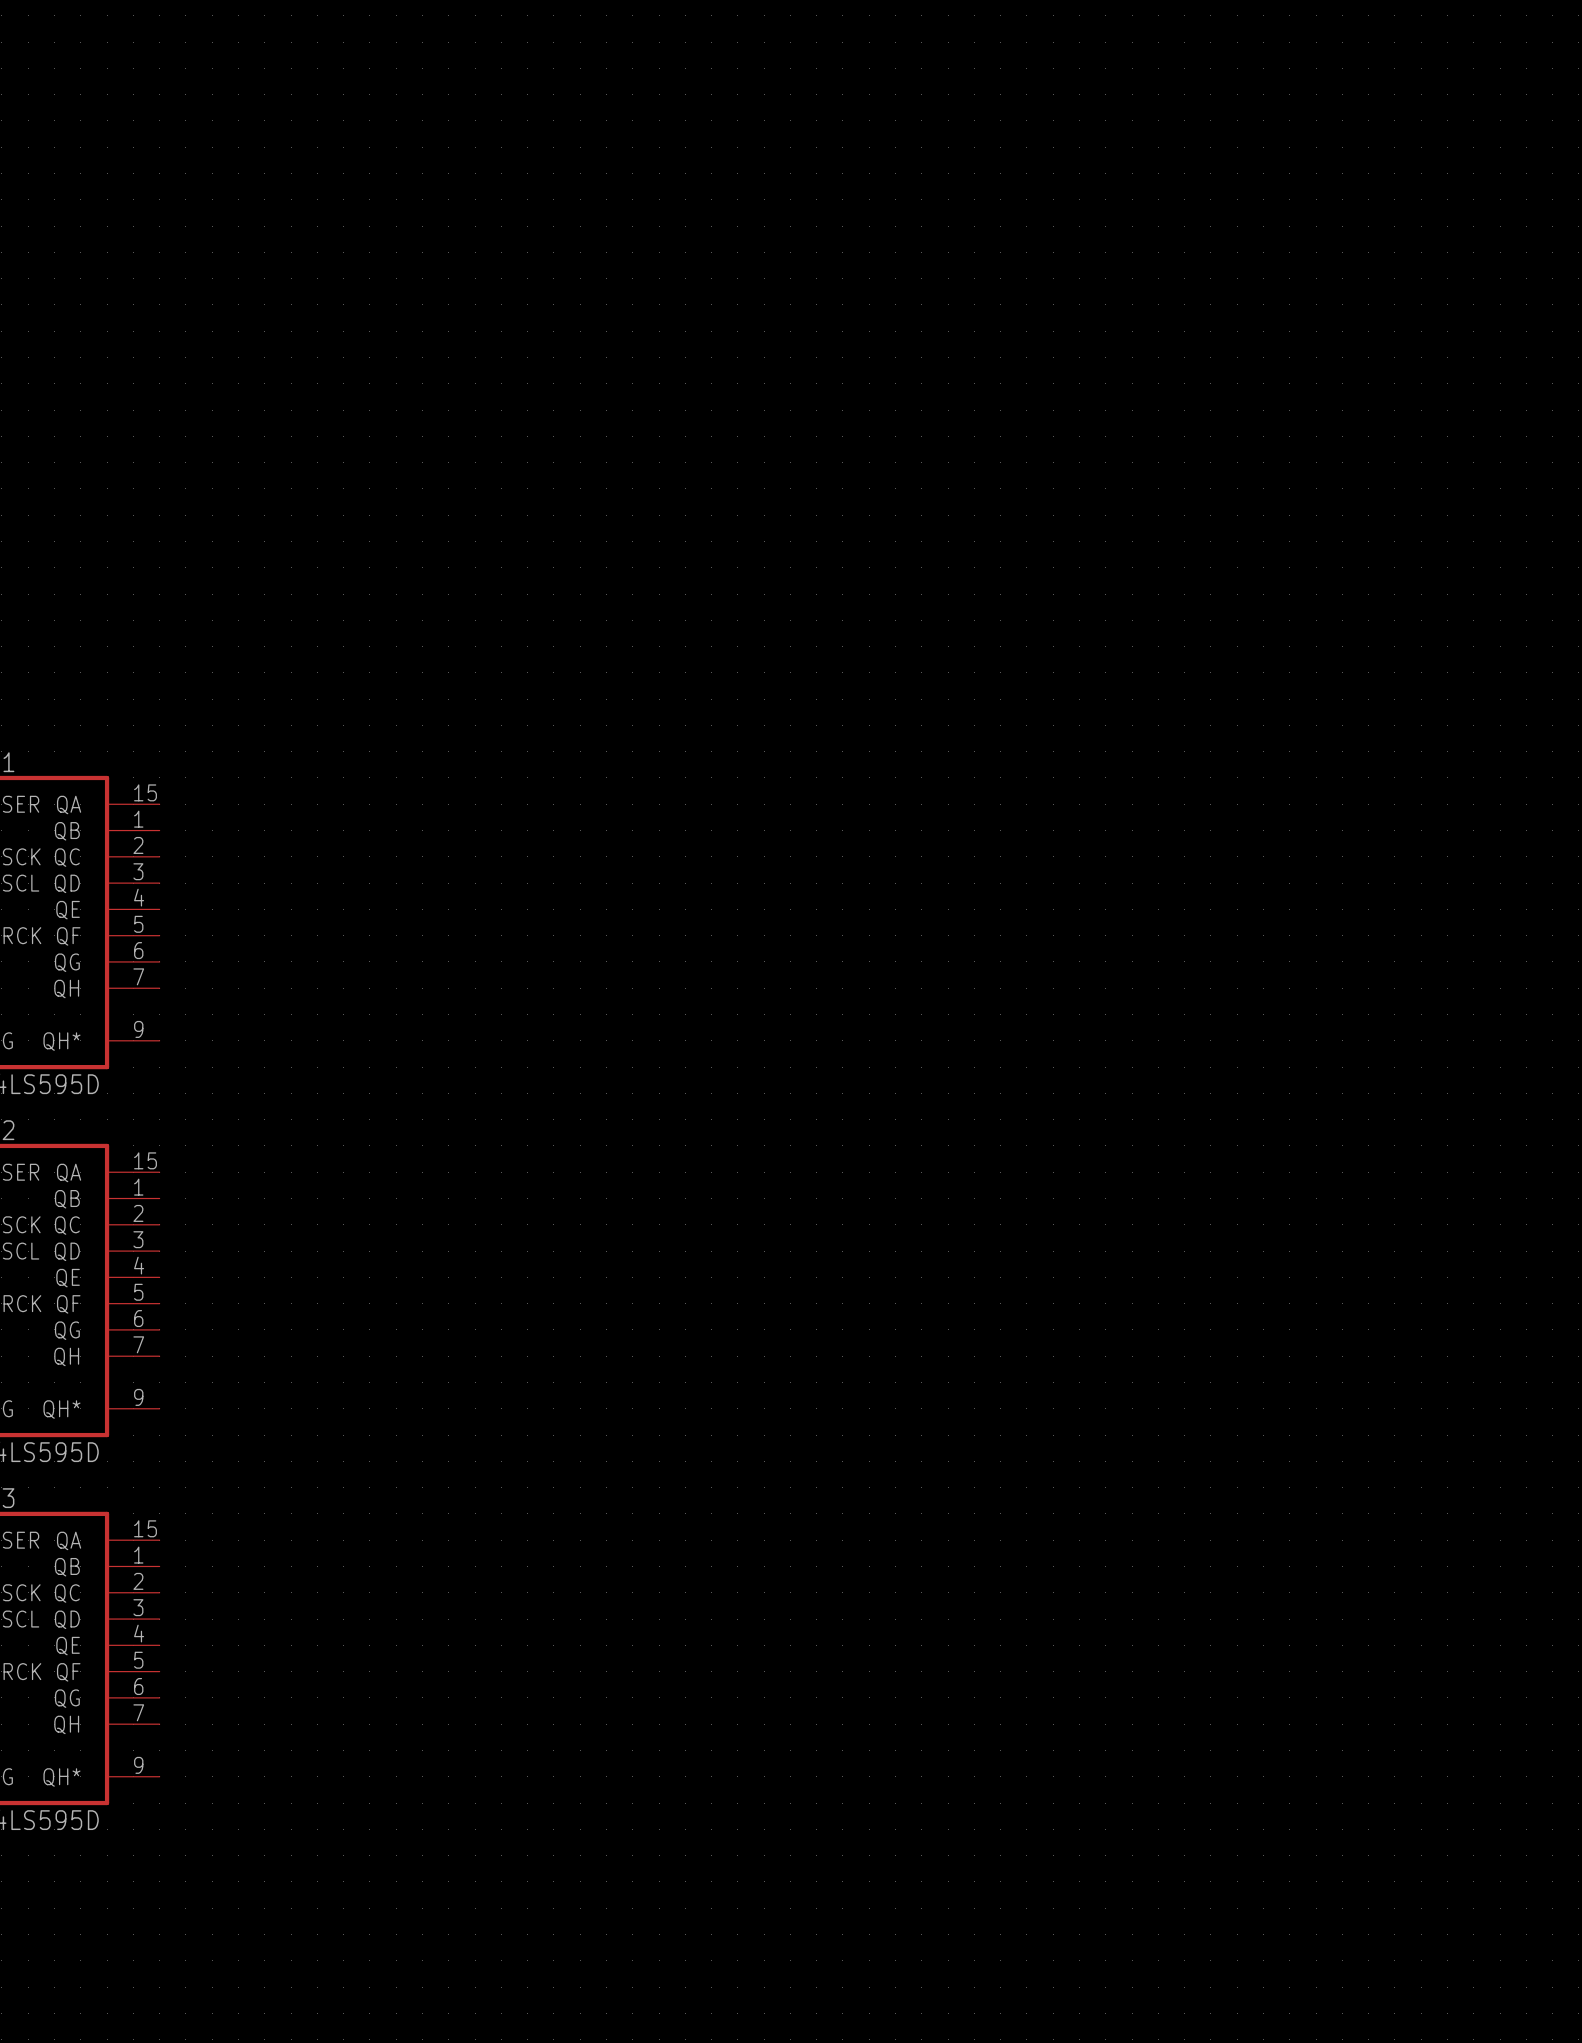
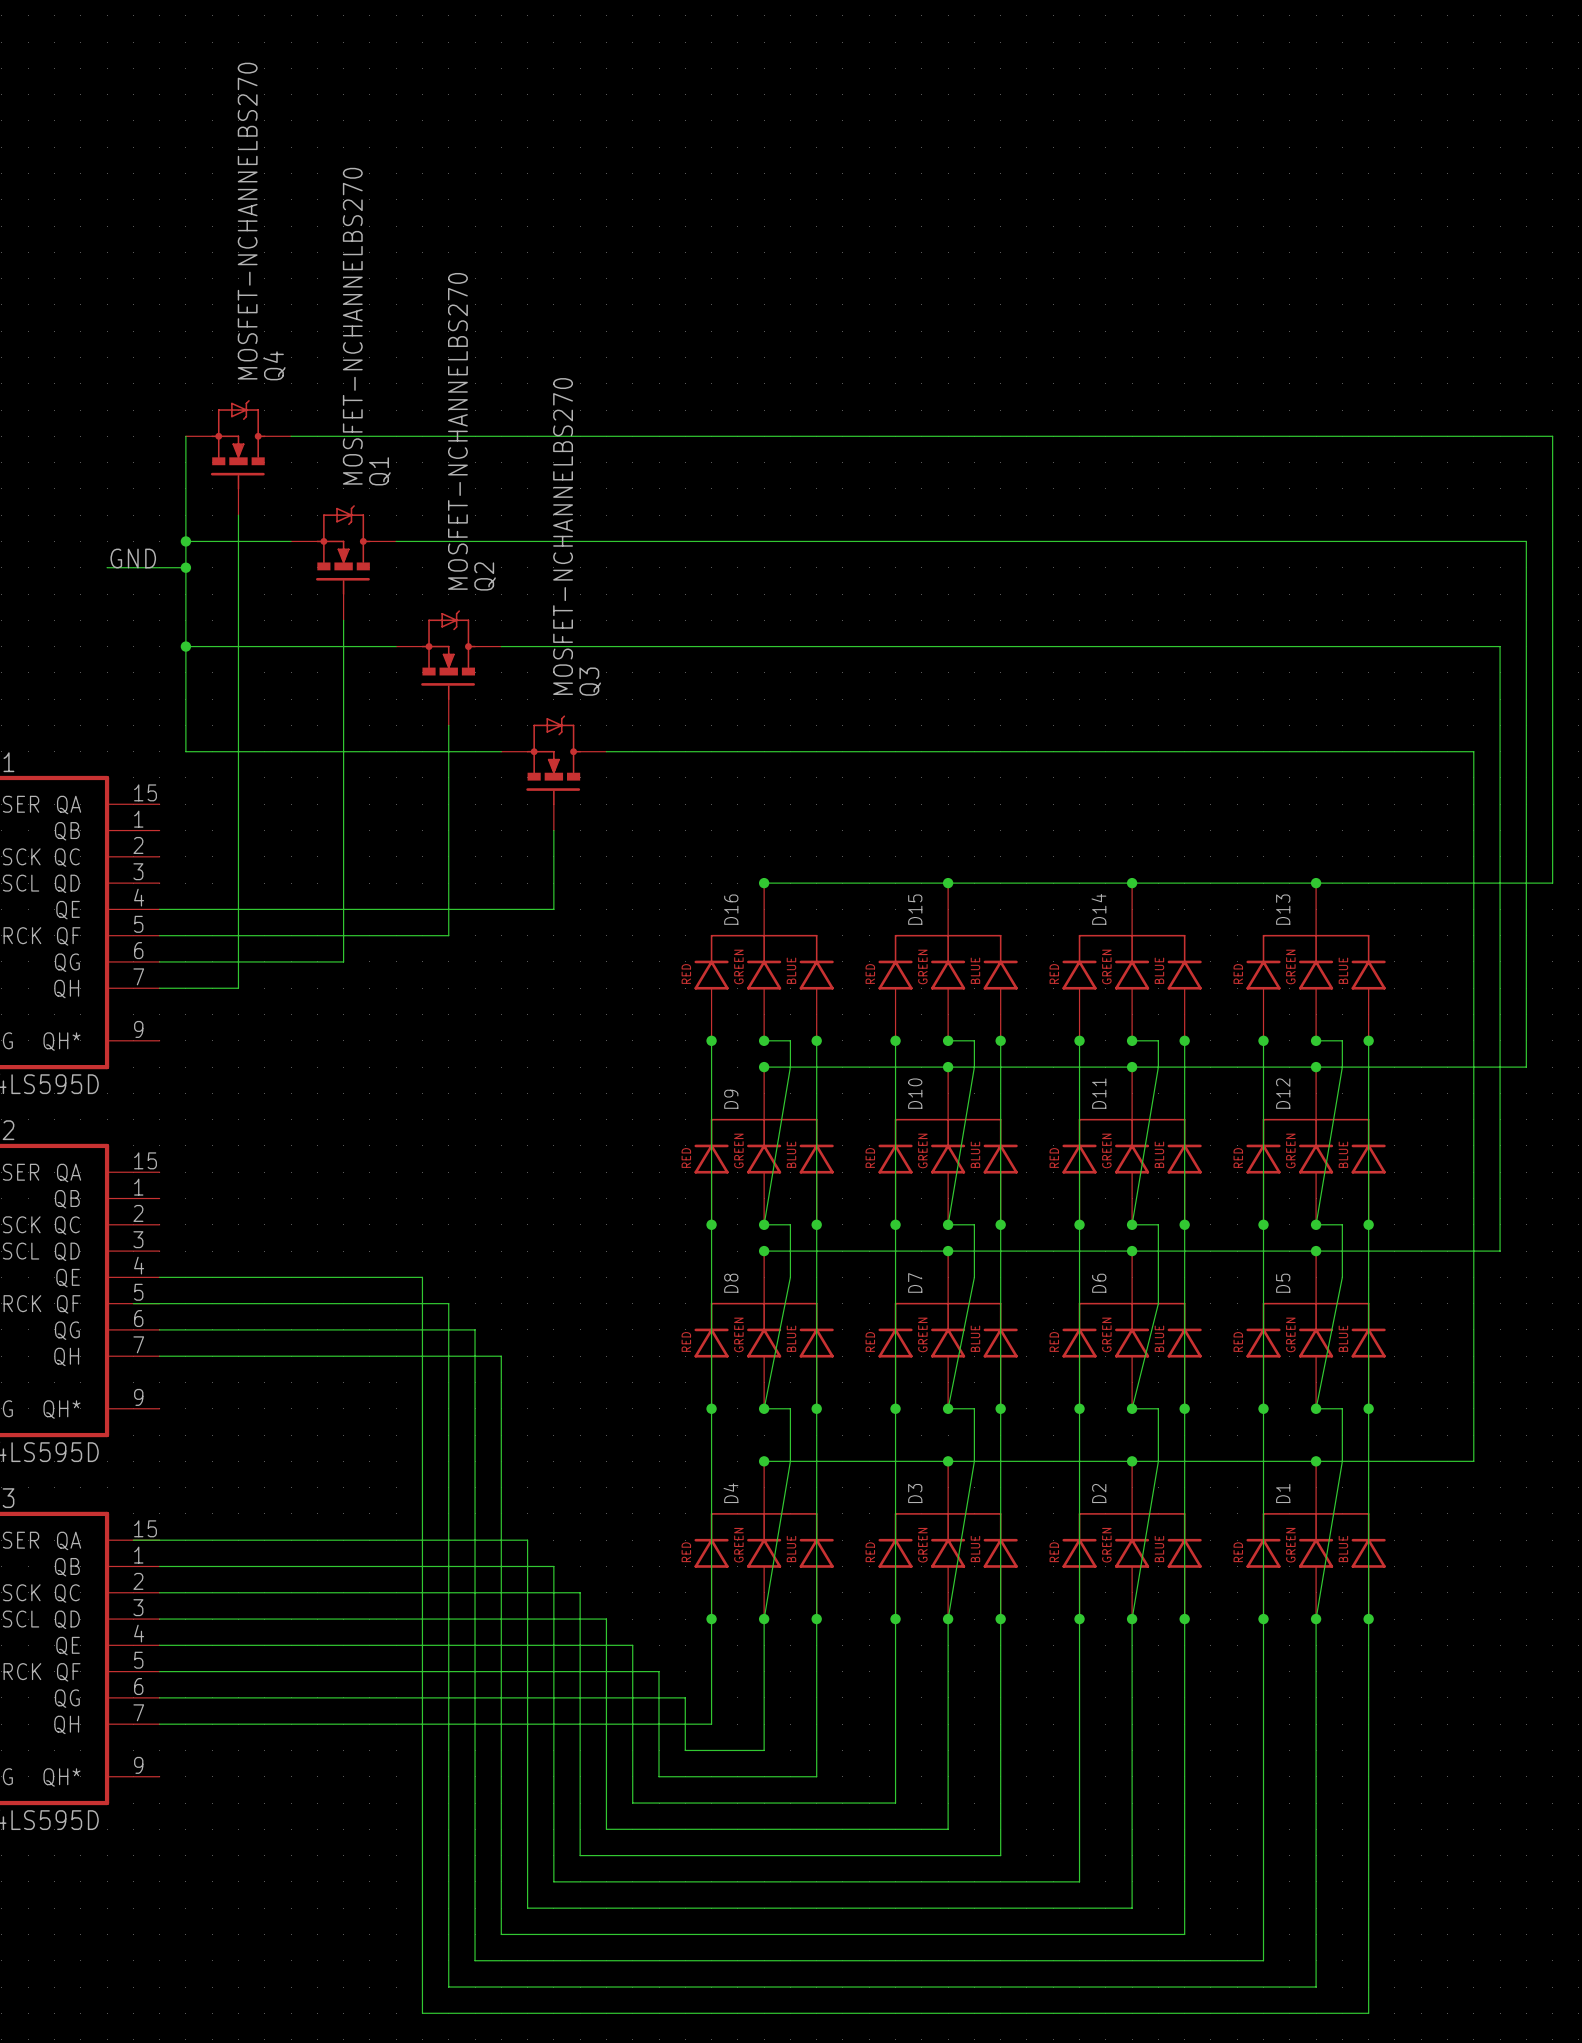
wire: none -> (185, 436) (185, 751) (501, 751)
wire: none -> (291, 436) (1552, 436) (1552, 883) (764, 883)
Q4: none -> MOSFET-NCHANNELBS270 (238, 457)
wire: none -> (238, 515) (238, 988) (159, 988)
wire: none -> (185, 541) (291, 541)
junction: none -> (185, 541)
wire: none -> (396, 541) (1526, 541) (1526, 1067) (764, 1067)
label: none -> GND (133, 558)
Q1: none -> MOSFET-NCHANNELBS270 (343, 562)
wire: none -> (107, 567) (185, 567)
junction: none -> (185, 567)
wire: none -> (343, 620) (343, 961) (159, 961)
wire: none -> (185, 646) (396, 646)
junction: none -> (185, 646)
wire: none -> (501, 646) (1500, 646) (1500, 1251) (764, 1251)
Q2: none -> MOSFET-NCHANNELBS270 (448, 667)
wire: none -> (448, 725) (448, 935) (159, 935)
wire: none -> (606, 751) (1473, 751) (1473, 1461) (764, 1461)
Q3: none -> MOSFET-NCHANNELBS270 (553, 772)
wire: none -> (553, 830) (553, 909) (159, 909)
junction: none -> (764, 883)
junction: none -> (948, 883)
junction: none -> (1132, 883)
junction: none -> (1316, 883)
D16: none -> (764, 961)
D15: none -> (948, 961)
D14: none -> (1132, 961)
D13: none -> (1316, 961)
wire: none -> (711, 1040) (711, 1724) (159, 1724)
junction: none -> (711, 1040)
wire: none -> (764, 1040) (790, 1040) (790, 1067) (764, 1224) (790, 1224) (790, 1277) (764, 1408) (790, 1408) (790, 1461) (764, 1619) (764, 1750) (685, 1750) (685, 1697) (159, 1697)
junction: none -> (764, 1040)
wire: none -> (816, 1040) (816, 1776) (659, 1776) (659, 1671) (159, 1671)
junction: none -> (816, 1040)
wire: none -> (895, 1040) (895, 1803) (632, 1803) (632, 1645) (159, 1645)
junction: none -> (895, 1040)
wire: none -> (948, 1040) (974, 1040) (974, 1067) (948, 1224) (974, 1224) (974, 1277) (948, 1408) (974, 1408) (974, 1461) (948, 1619) (948, 1829) (606, 1829) (606, 1619) (159, 1619)
junction: none -> (948, 1040)
wire: none -> (1000, 1040) (1000, 1855) (580, 1855) (580, 1592) (159, 1592)
junction: none -> (1000, 1040)
wire: none -> (1079, 1040) (1079, 1881) (553, 1881) (553, 1566) (159, 1566)
junction: none -> (1079, 1040)
wire: none -> (1132, 1040) (1158, 1040) (1158, 1067) (1132, 1224) (1158, 1224) (1158, 1303) (1132, 1408) (1158, 1408) (1158, 1461) (1132, 1619) (1132, 1908) (527, 1908) (527, 1540) (133, 1540)
junction: none -> (1132, 1040)
wire: none -> (1184, 1040) (1184, 1934) (501, 1934) (501, 1356) (159, 1356)
junction: none -> (1184, 1040)
wire: none -> (1263, 1040) (1263, 1960) (475, 1960) (475, 1329) (159, 1329)
junction: none -> (1263, 1040)
wire: none -> (1316, 1040) (1342, 1040) (1342, 1067) (1316, 1224) (1342, 1224) (1342, 1277) (1316, 1408) (1342, 1408) (1342, 1461) (1316, 1619) (1316, 1987) (448, 1987) (448, 1303) (133, 1303)
junction: none -> (1316, 1040)
wire: none -> (1368, 1040) (1368, 2013) (422, 2013) (422, 1277) (159, 1277)
junction: none -> (1368, 1040)
junction: none -> (764, 1067)
junction: none -> (948, 1067)
junction: none -> (1132, 1067)
junction: none -> (1316, 1067)
D9: none -> (764, 1145)
D10: none -> (948, 1145)
D11: none -> (1132, 1145)
D12: none -> (1316, 1145)
junction: none -> (711, 1224)
junction: none -> (764, 1224)
junction: none -> (816, 1224)
junction: none -> (895, 1224)
junction: none -> (948, 1224)
junction: none -> (1000, 1224)
junction: none -> (1079, 1224)
junction: none -> (1132, 1224)
junction: none -> (1184, 1224)
junction: none -> (1263, 1224)
junction: none -> (1316, 1224)
junction: none -> (1368, 1224)
junction: none -> (764, 1251)
junction: none -> (948, 1251)
junction: none -> (1132, 1251)
junction: none -> (1316, 1251)
D8: none -> (764, 1329)
D7: none -> (948, 1329)
D6: none -> (1132, 1329)
D5: none -> (1316, 1329)
junction: none -> (711, 1408)
junction: none -> (764, 1408)
junction: none -> (816, 1408)
junction: none -> (895, 1408)
junction: none -> (948, 1408)
junction: none -> (1000, 1408)
junction: none -> (1079, 1408)
junction: none -> (1132, 1408)
junction: none -> (1184, 1408)
junction: none -> (1263, 1408)
junction: none -> (1316, 1408)
junction: none -> (1368, 1408)
junction: none -> (764, 1461)
junction: none -> (948, 1461)
junction: none -> (1132, 1461)
junction: none -> (1316, 1461)
D4: none -> (764, 1540)
D3: none -> (948, 1540)
D2: none -> (1132, 1540)
D1: none -> (1316, 1540)
junction: none -> (711, 1619)
junction: none -> (764, 1619)
junction: none -> (816, 1619)
junction: none -> (895, 1619)
junction: none -> (948, 1619)
junction: none -> (1000, 1619)
junction: none -> (1079, 1619)
junction: none -> (1132, 1619)
junction: none -> (1184, 1619)
junction: none -> (1263, 1619)
junction: none -> (1316, 1619)
junction: none -> (1368, 1619)

